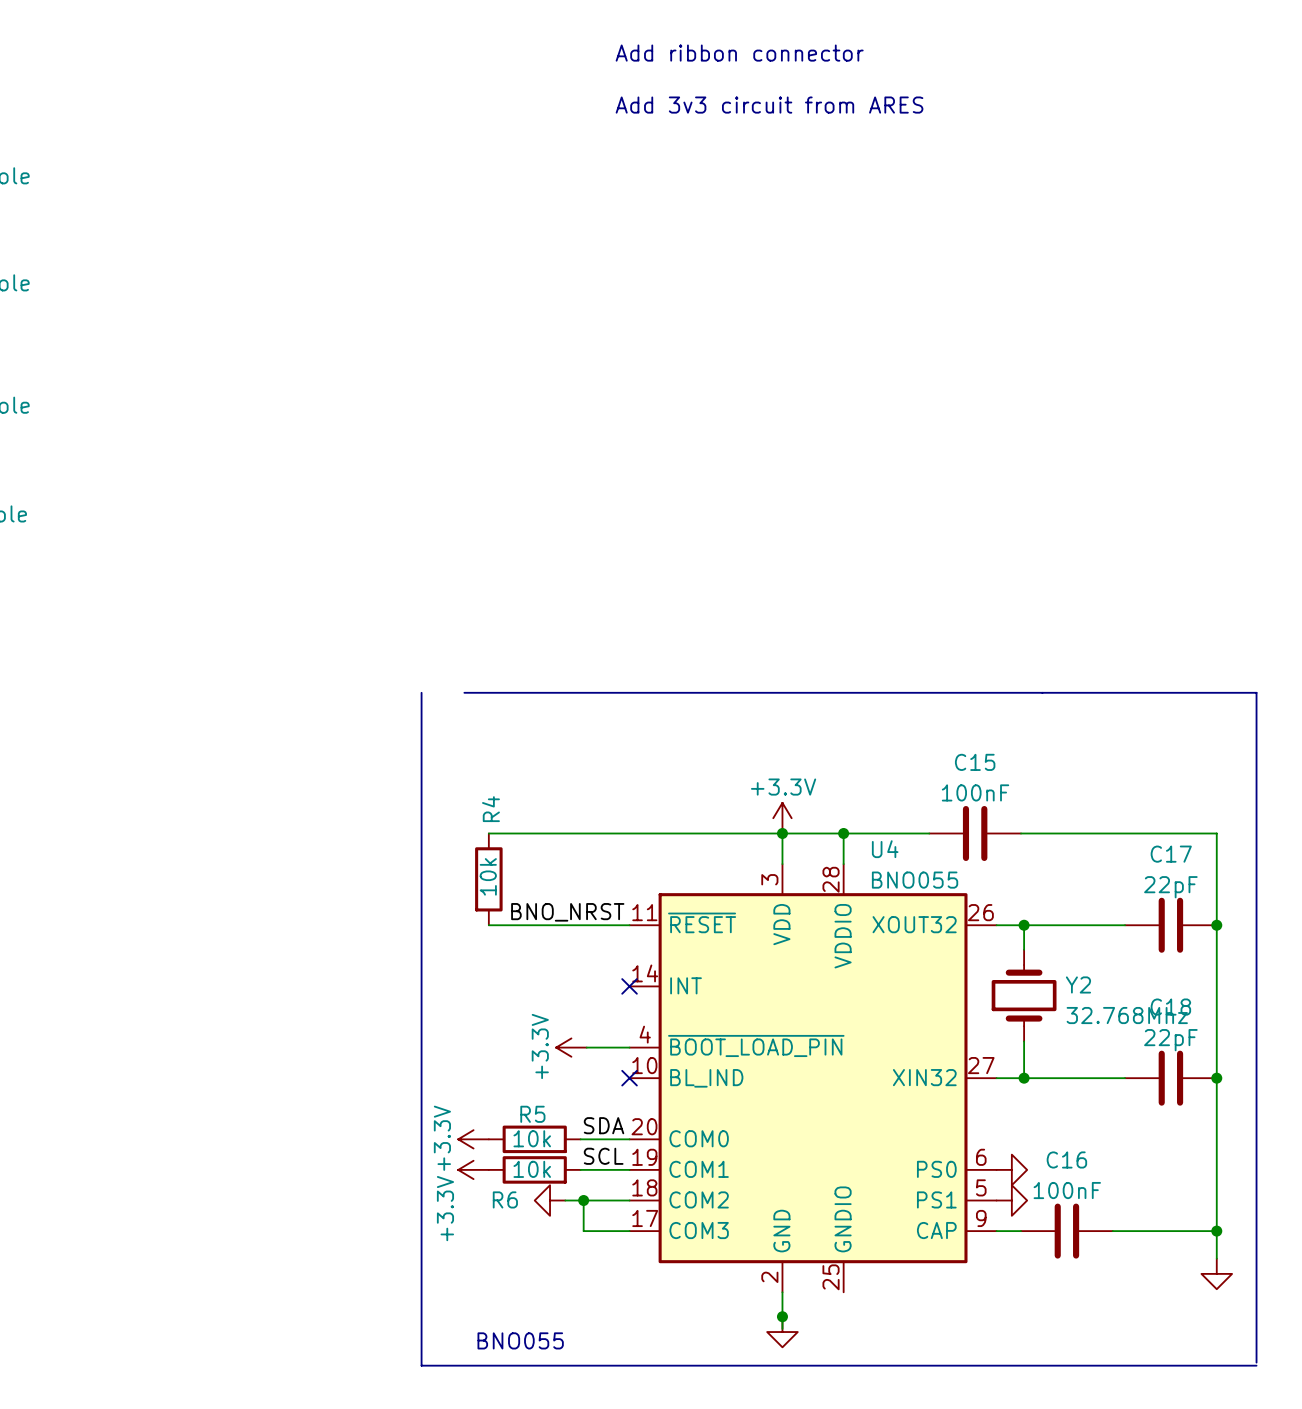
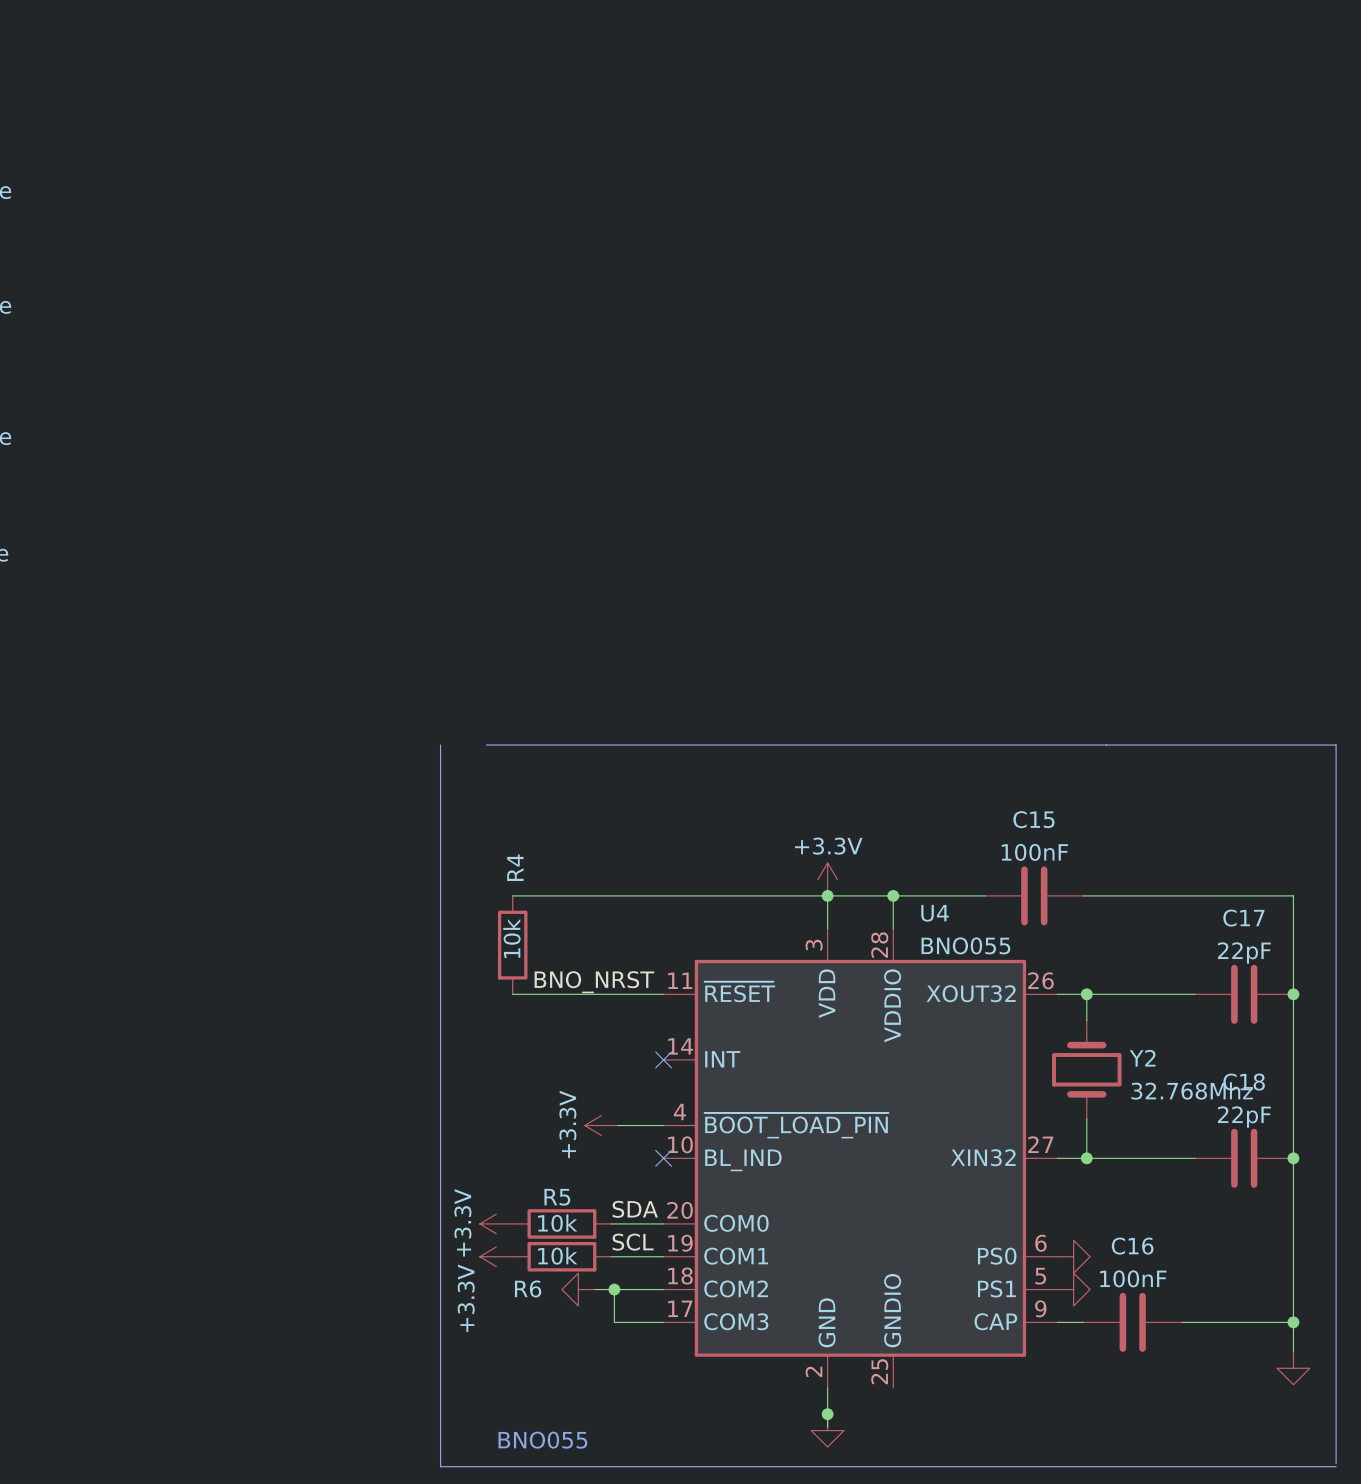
text: Add ribbon connector (739, 53) -> none
text: Add 3v3 circuit from ARES (769, 105) -> none

